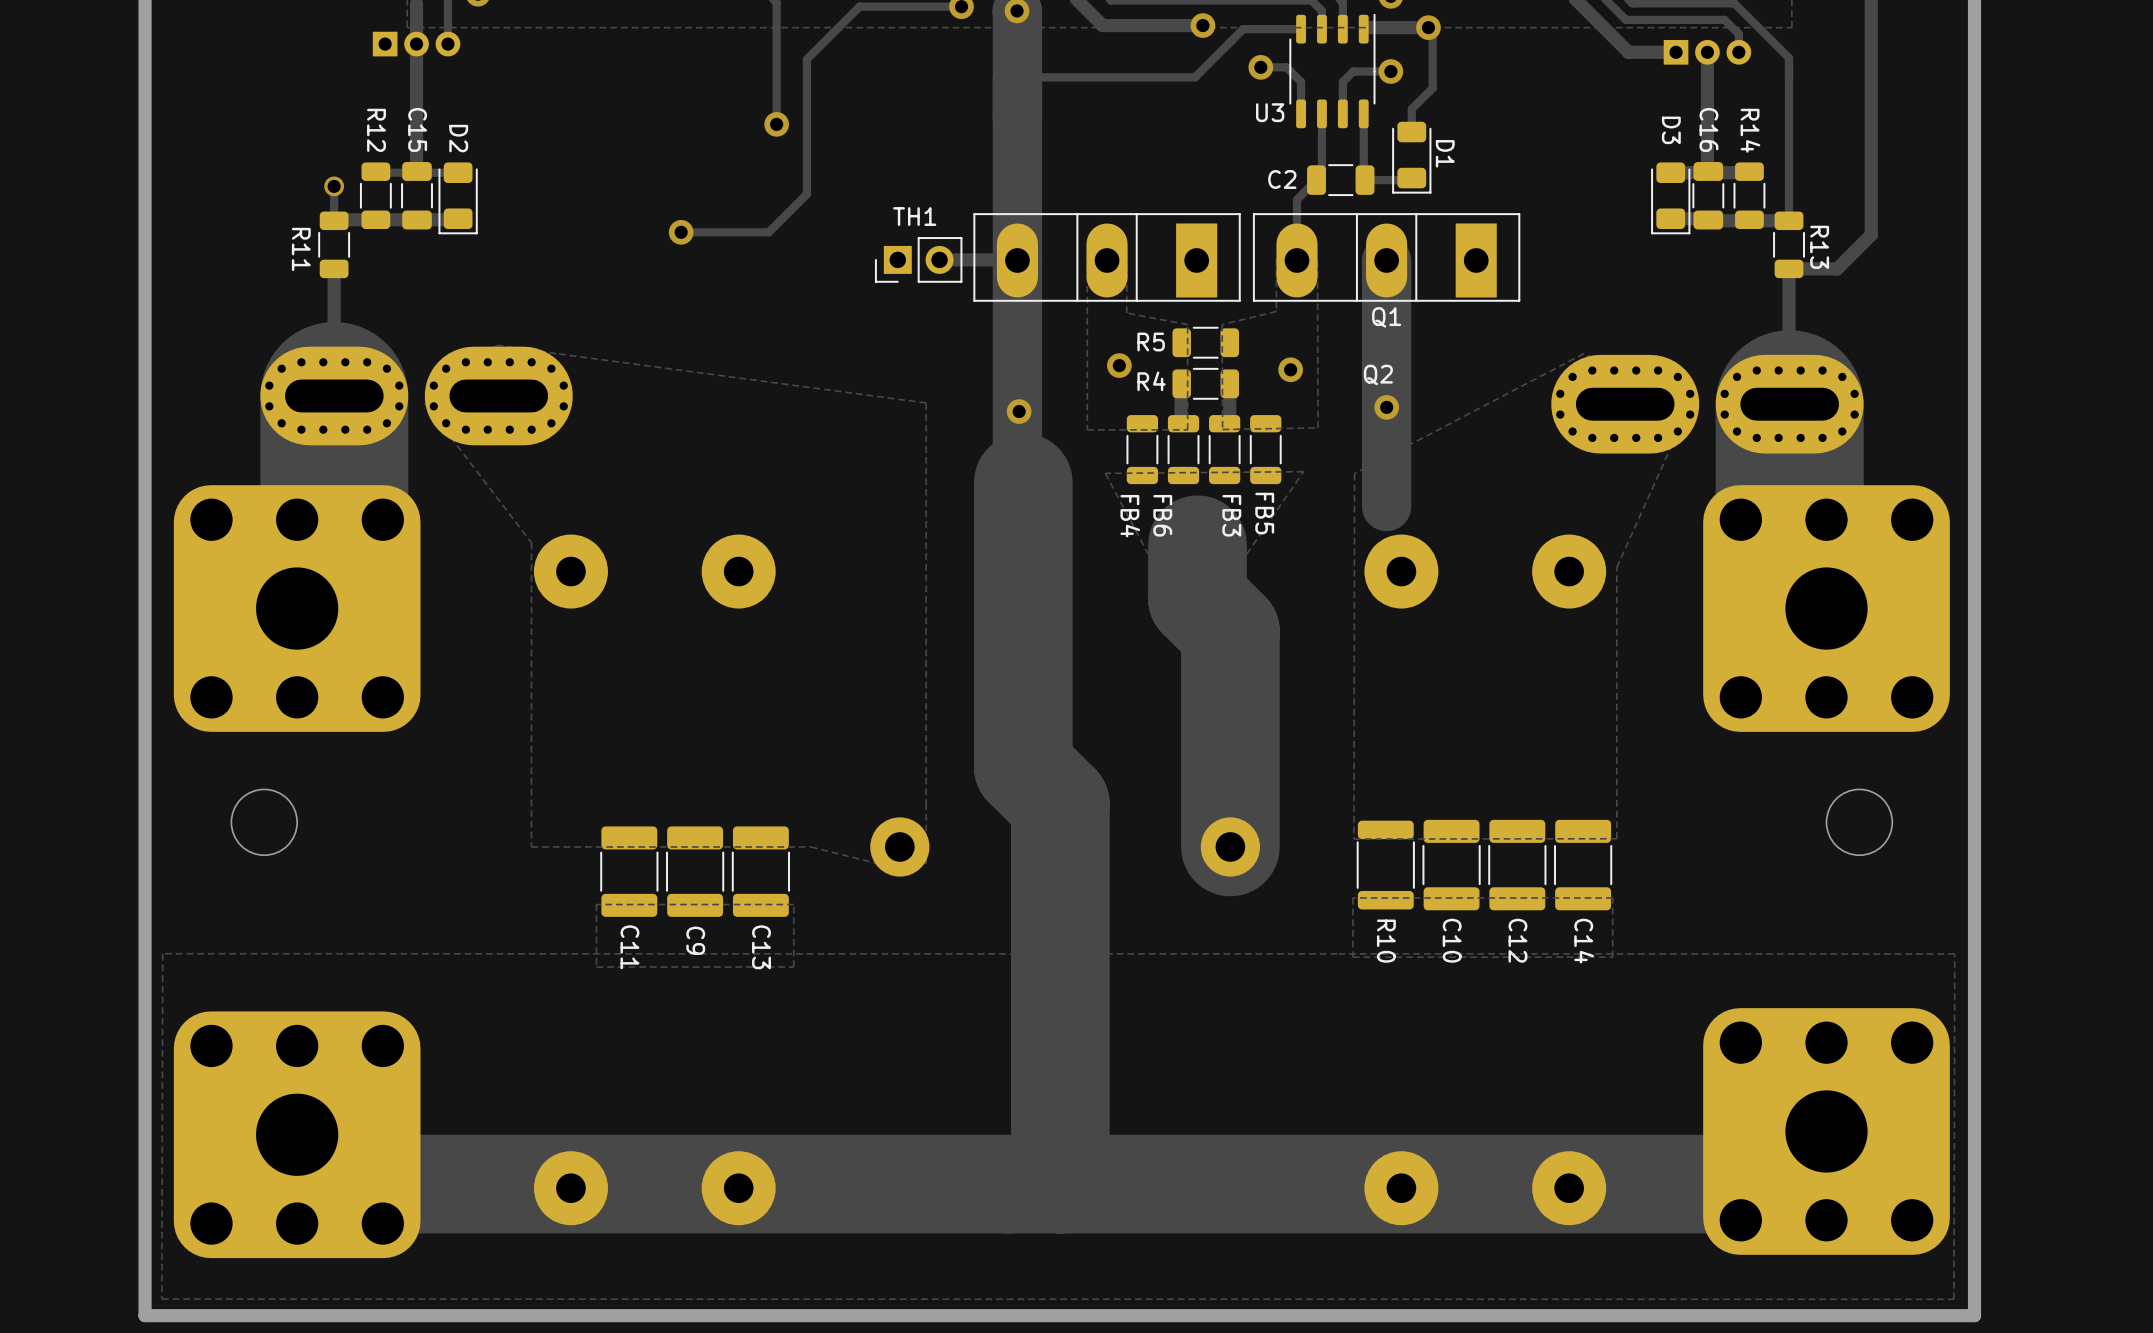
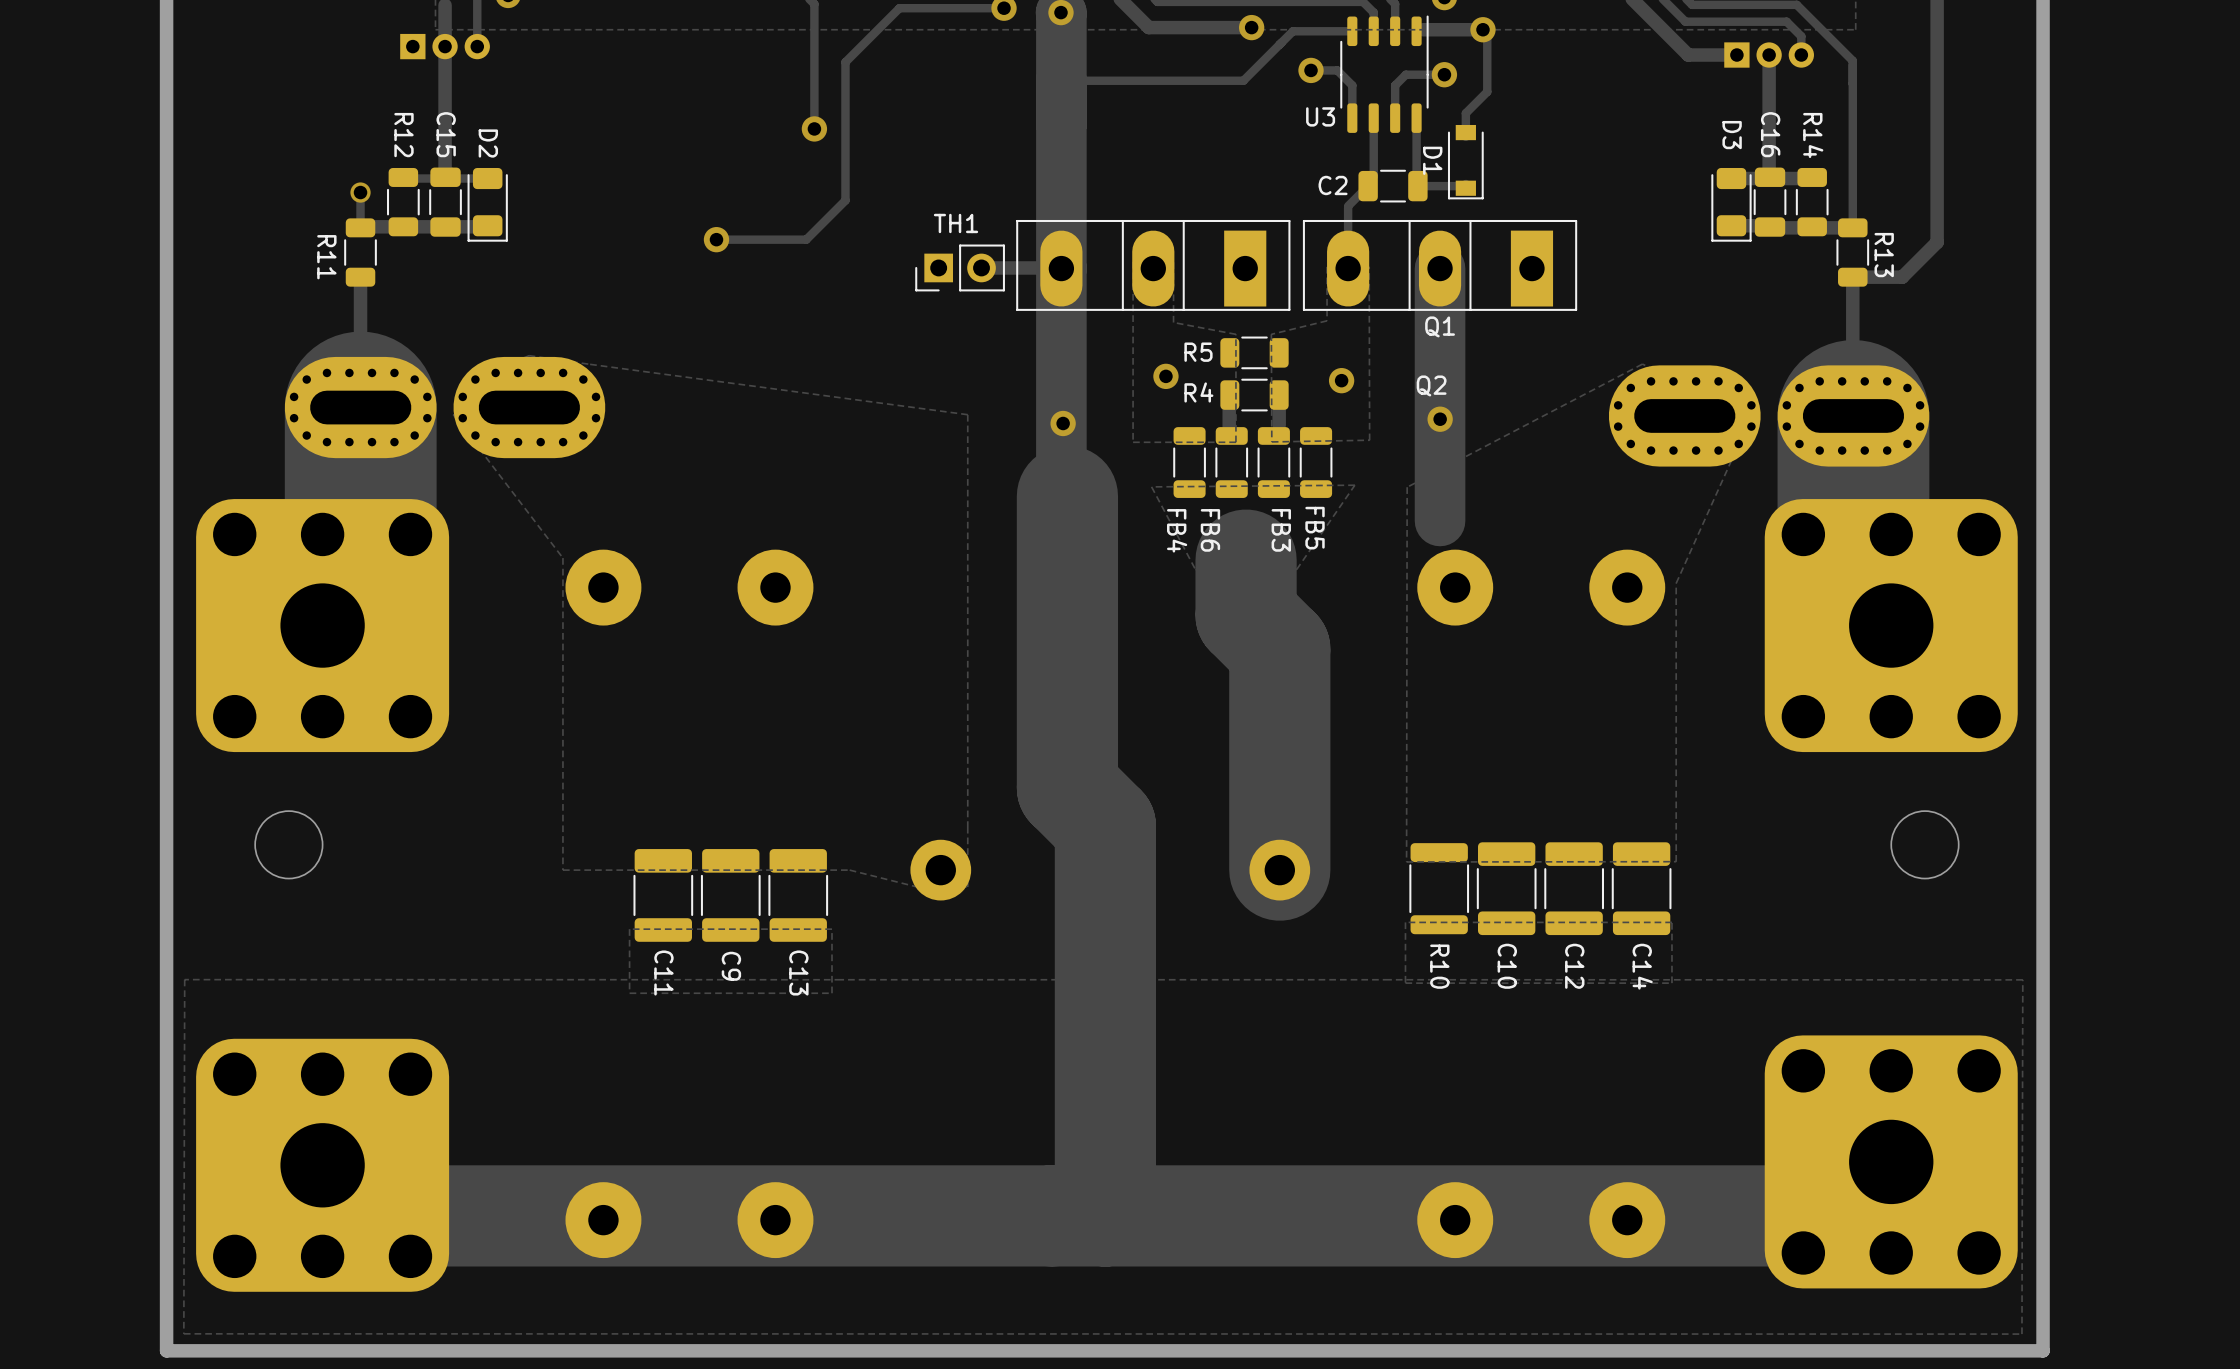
D1 footprint: [1392, 121, 1432, 194] -> [1447, 124, 1484, 200]
D1 name position: D1 (1445, 153) -> D1 (1432, 160)

